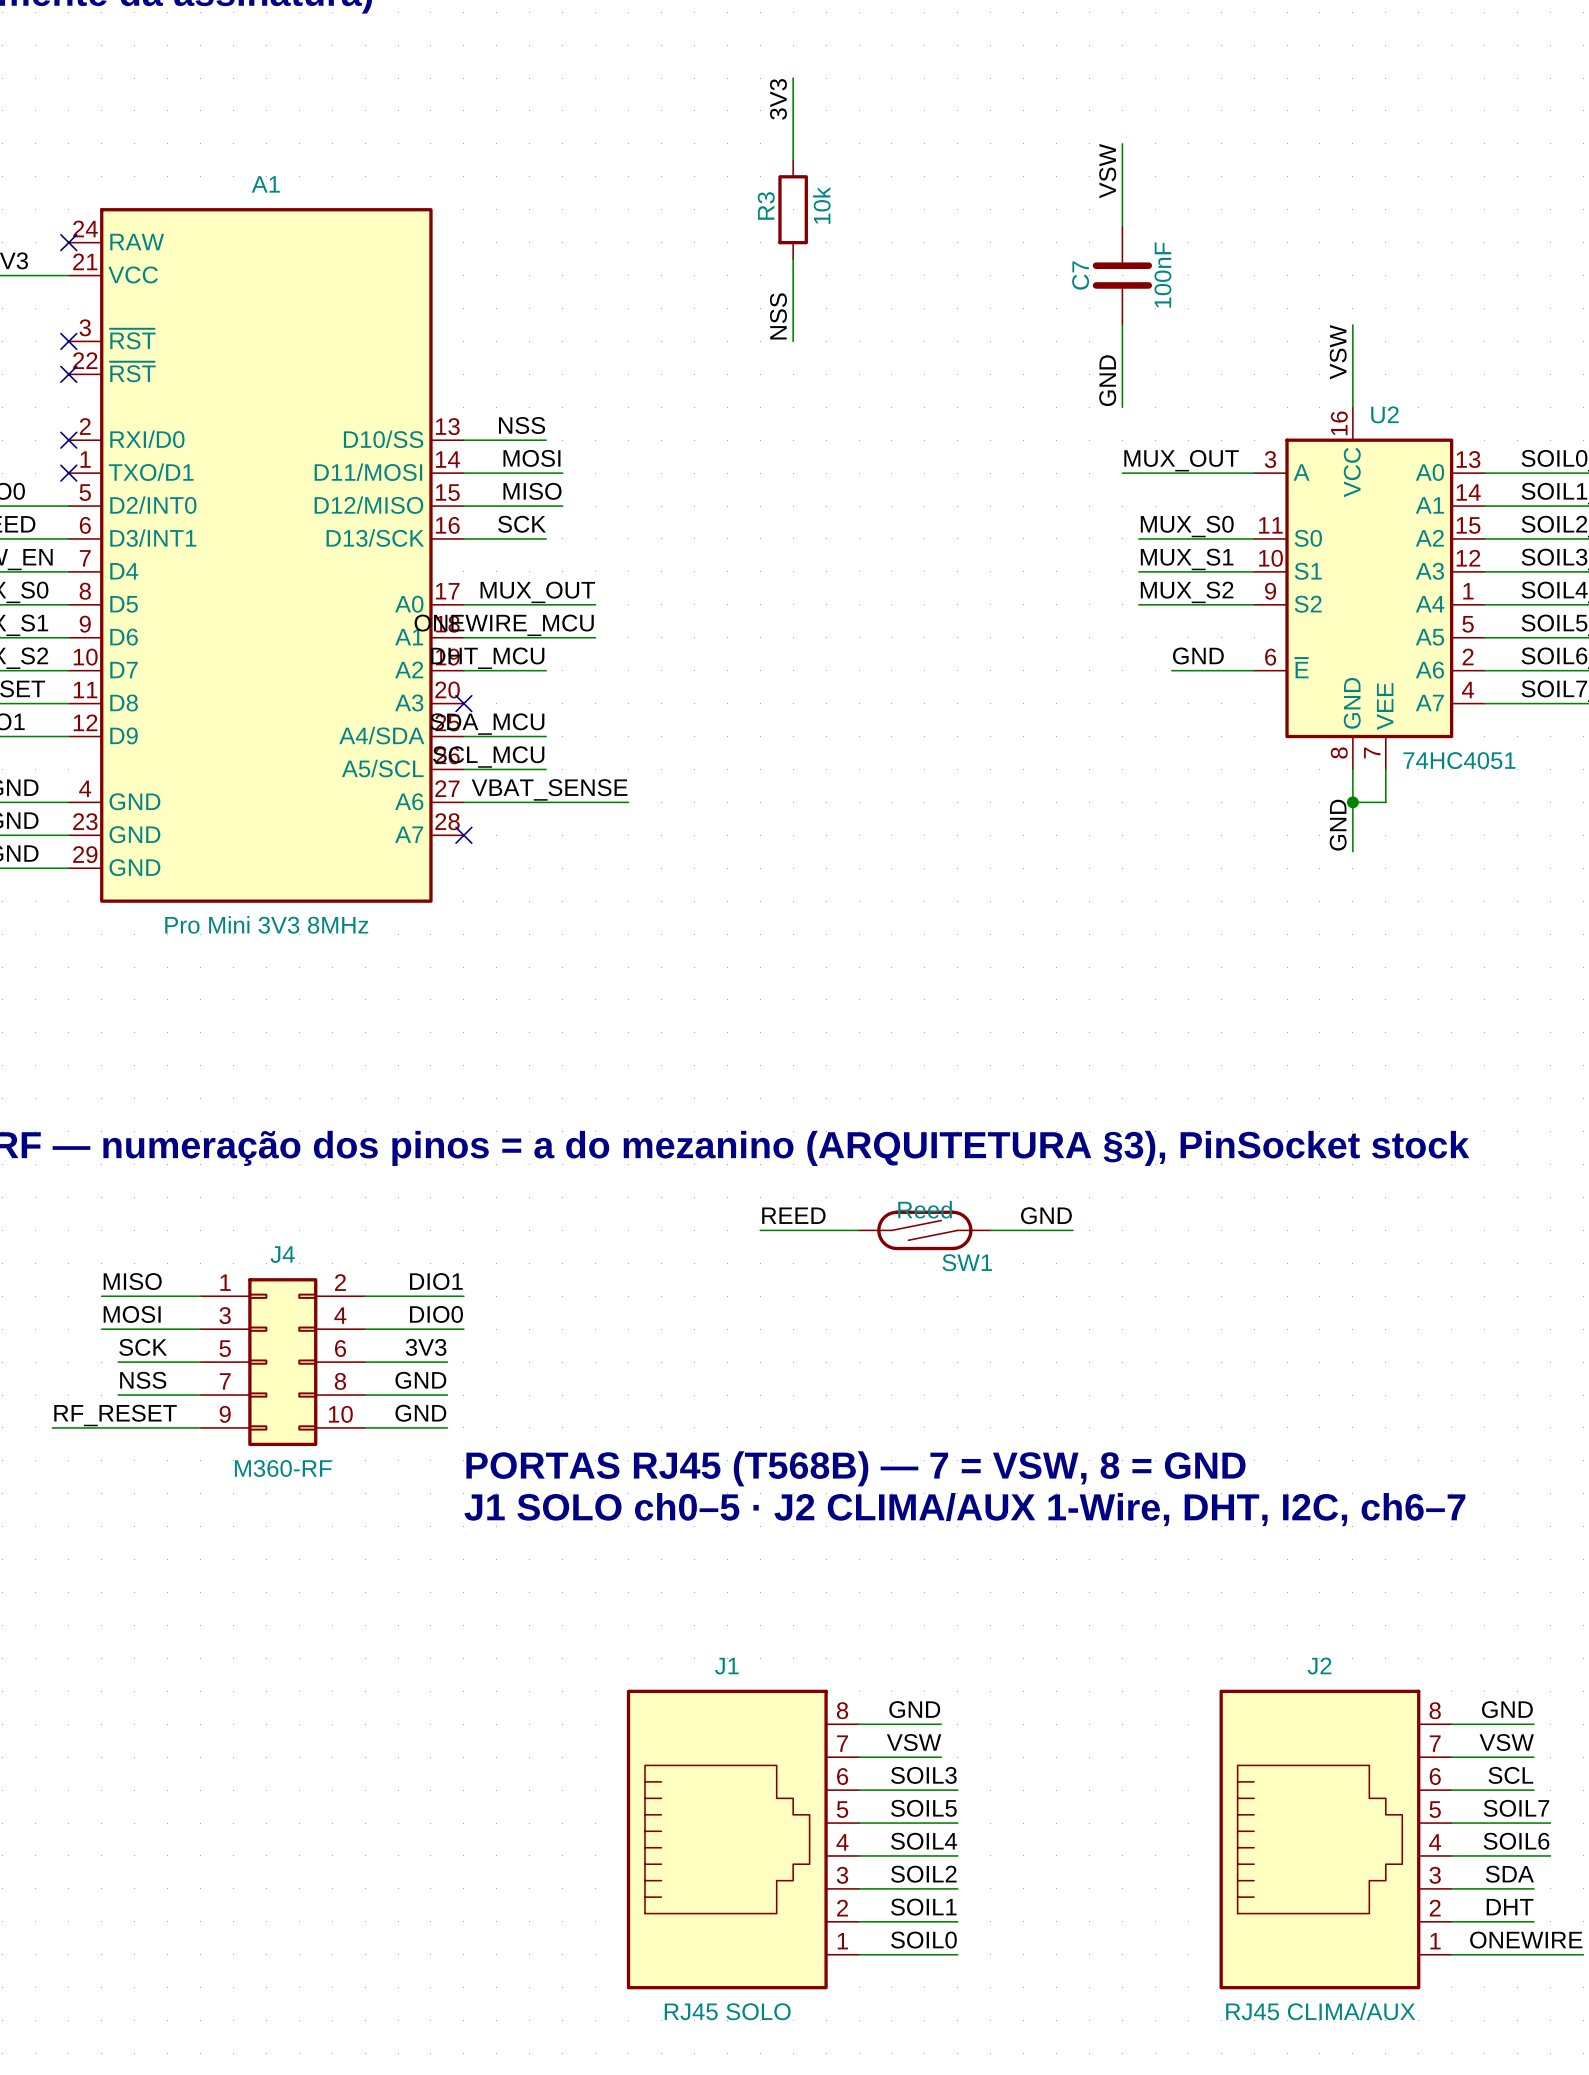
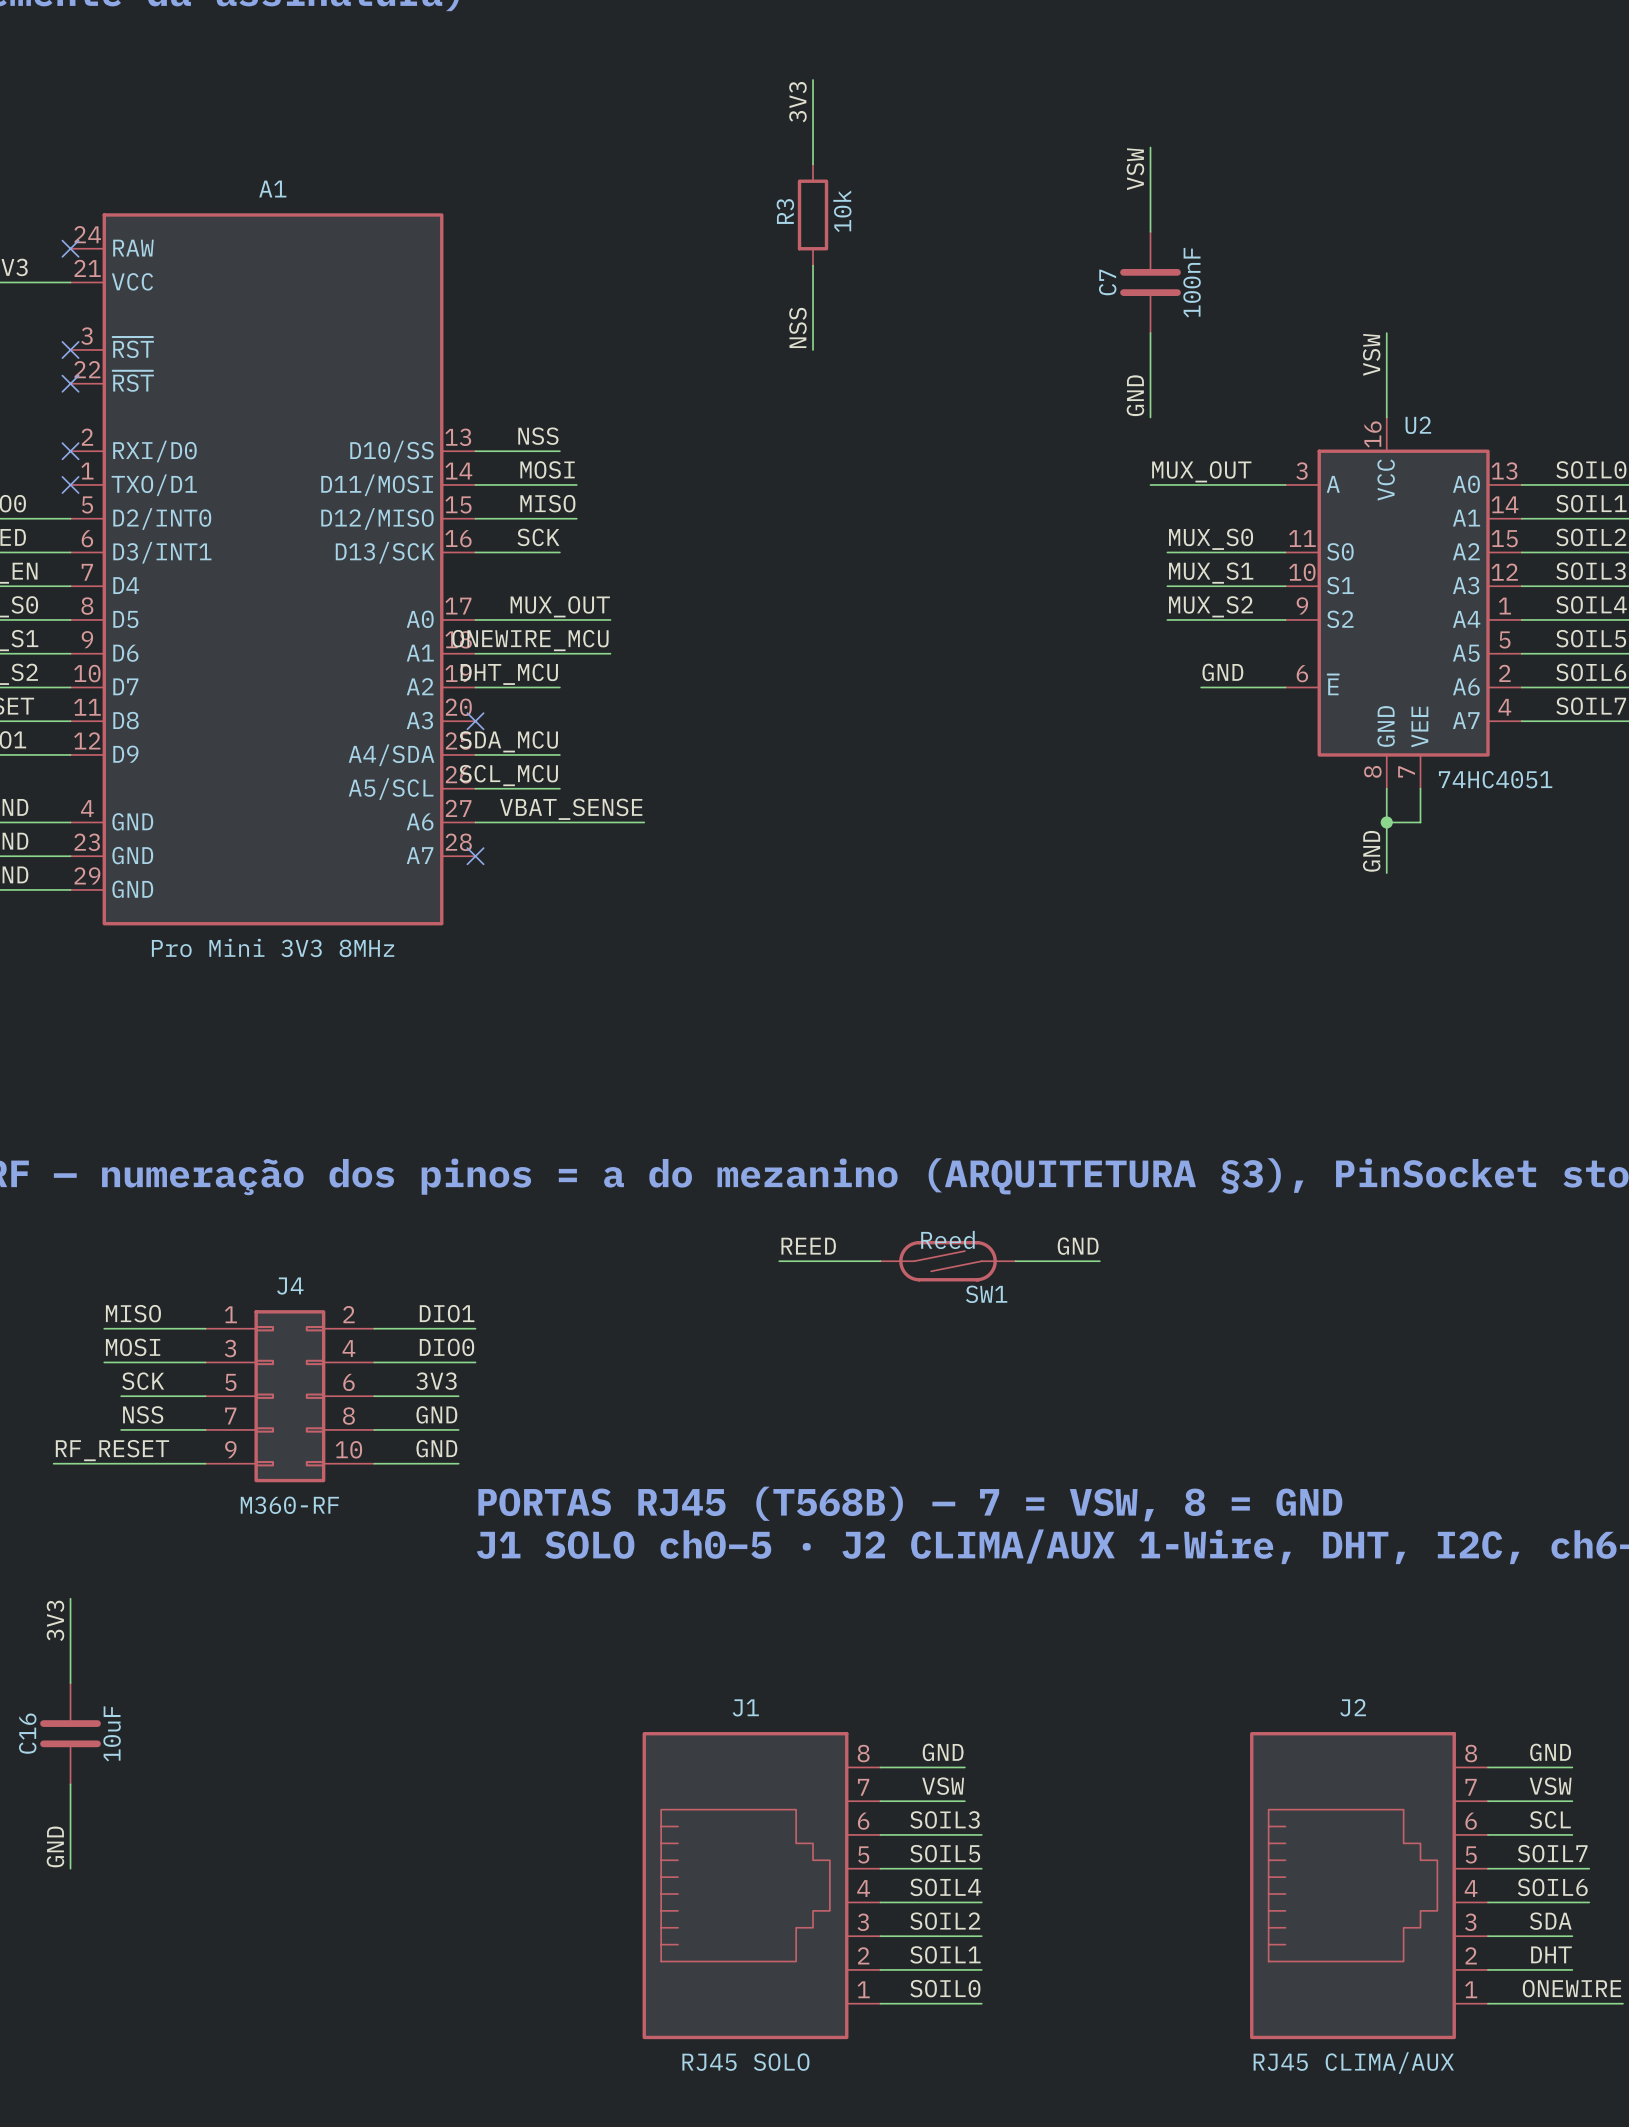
wire: none -> (70, 1598) (70, 1683)
label: none -> 3V3 (55, 1620)
C16: none -> 10uF (70, 1733)
wire: none -> (70, 1784) (70, 1868)
label: none -> GND (55, 1846)

